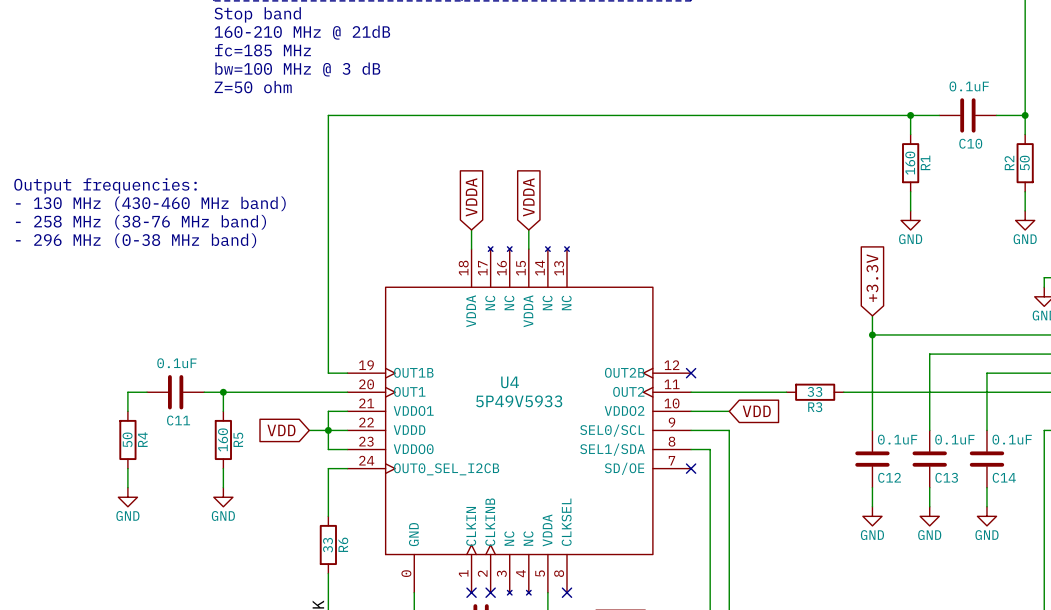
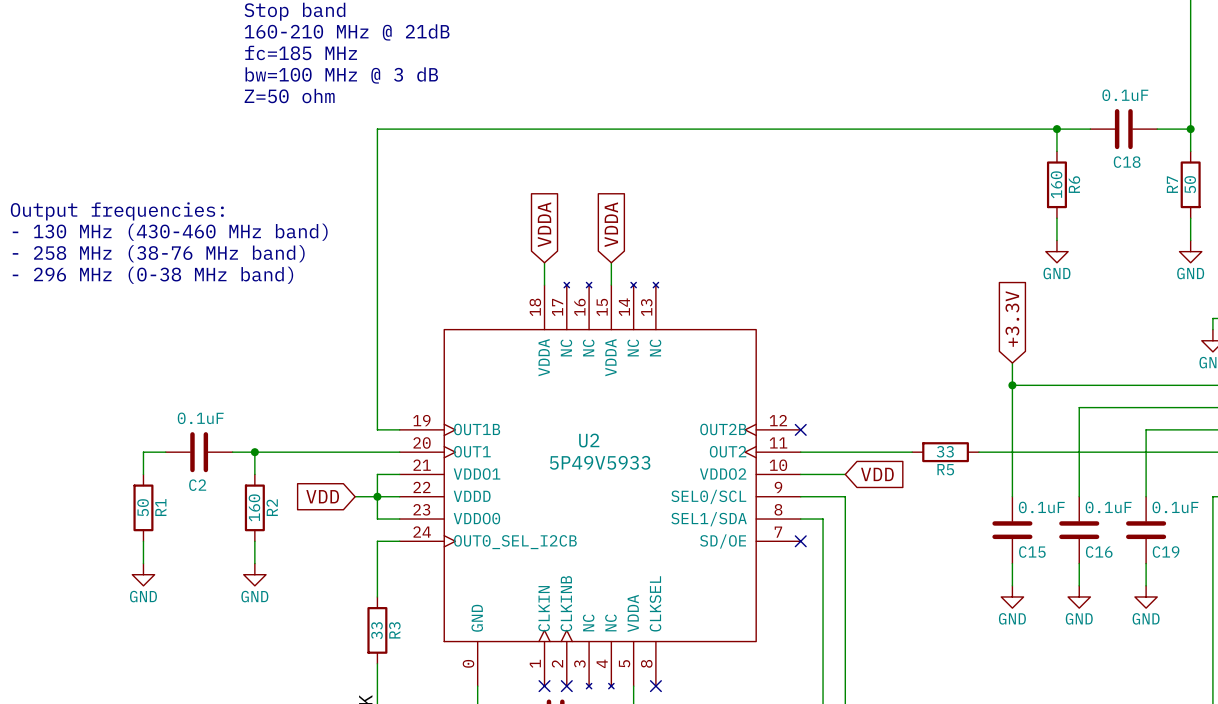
C10 name: C10 (970, 143) -> C18 (1127, 162)
R1 name: R1 (925, 162) -> R6 (1074, 184)
R2 name: R2 (1009, 162) -> R7 (1172, 184)
U4 name: U4 (510, 382) -> U2 (589, 440)
R3 name: R3 (815, 407) -> R5 (945, 469)
C11 name: C11 (178, 420) -> C2 (197, 485)
R4 name: R4 (142, 439) -> R1 (160, 507)
R5 name: R5 (238, 439) -> R2 (272, 507)
C12 name: C12 (889, 477) -> C15 (1032, 552)
C13 name: C13 (946, 477) -> C16 (1099, 552)
C14 name: C14 (1004, 477) -> C19 (1166, 552)
R6 name: R6 (343, 544) -> R3 (394, 630)

